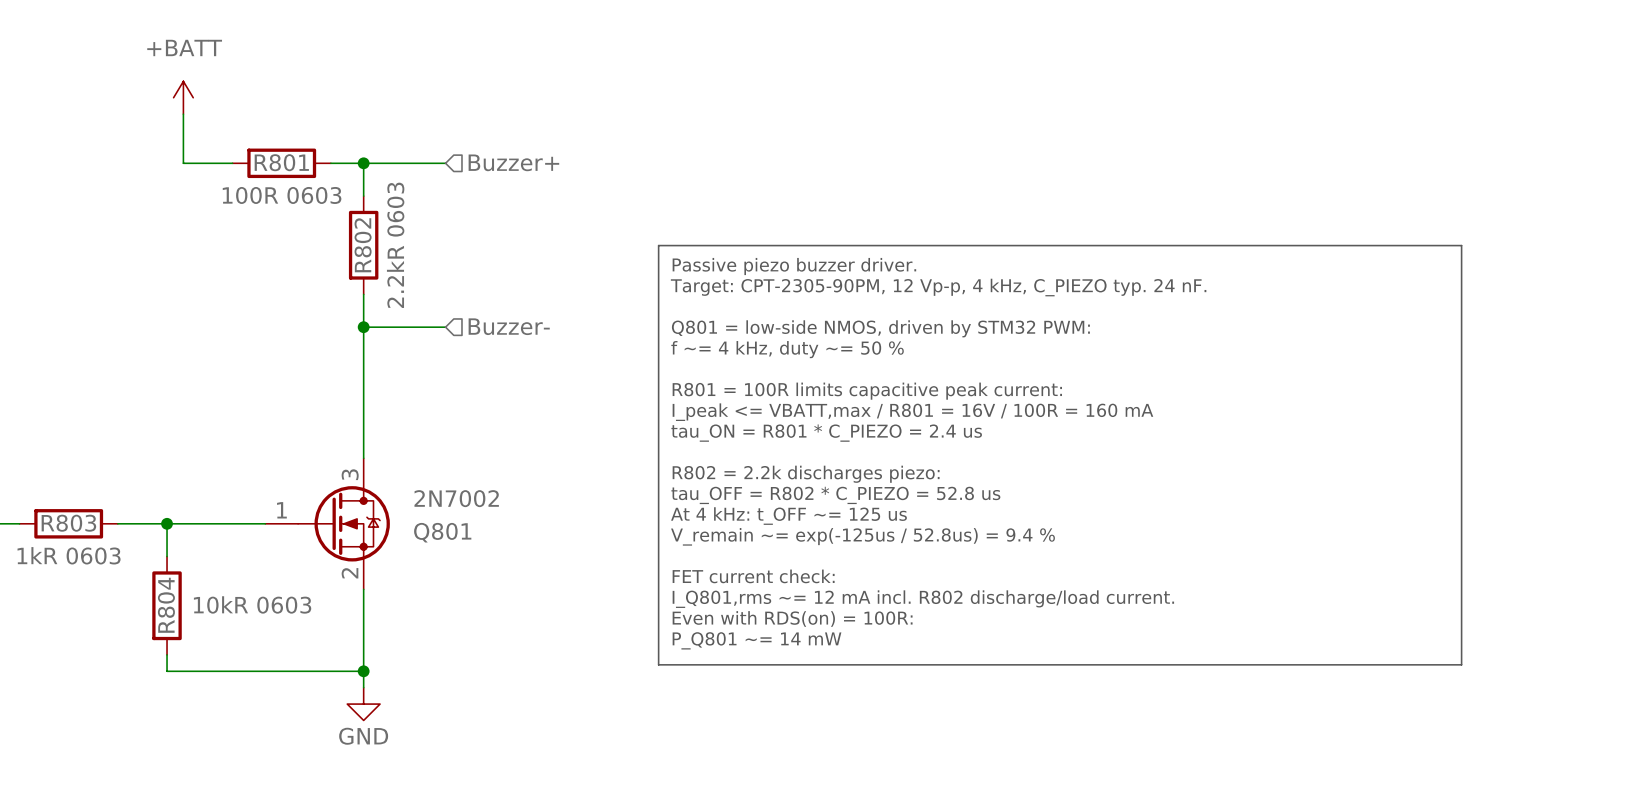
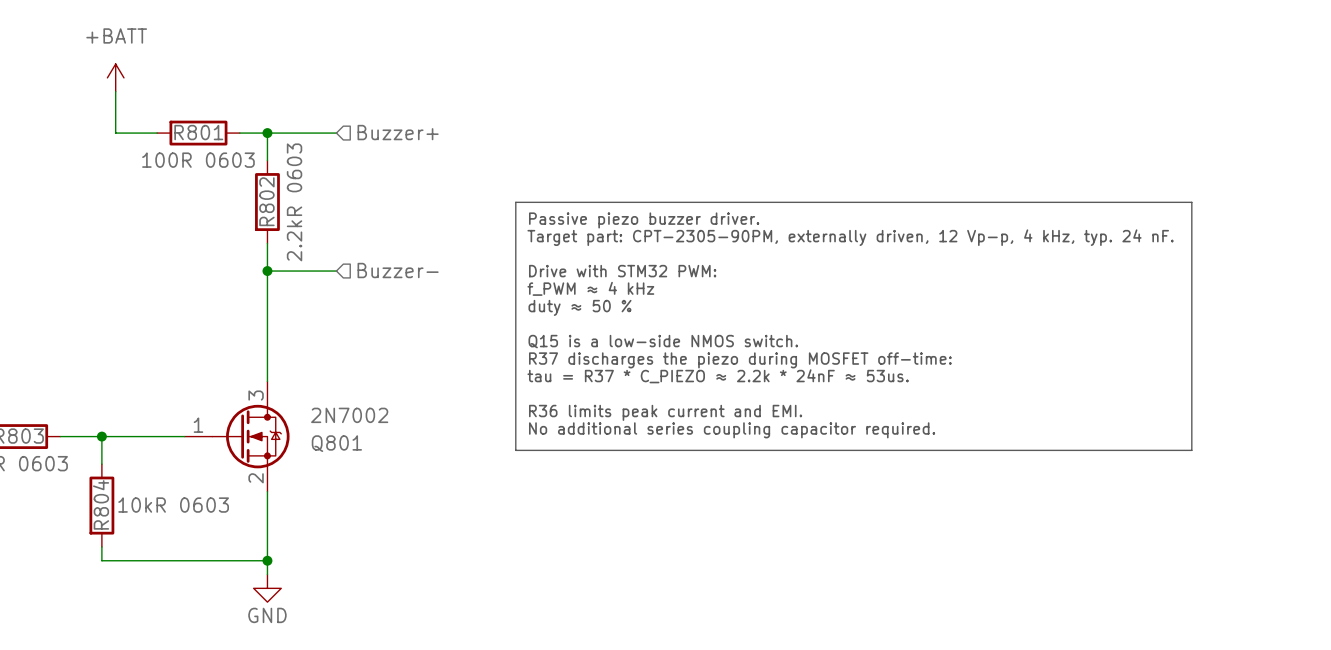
text: Target: CPT-2305-90PM, 12 Vp-p, 4 kHz, C_PIEZO typ. 24 nF. (938, 287) -> Target part: CPT-2305-90PM, externally driven, 12 Vp-p, 4 kHz, typ. 24 nF. (850, 237)
text: Q801 = low-side NMOS, driven by STM32 PWM: (880, 328) -> Drive with STM32 PWM: (622, 271)
text: f ~= 4 kHz, duty ~= 50 % (787, 349) -> f_PWM ≈ 4 kHz (590, 288)
text: none -> duty ≈ 50 % (579, 307)
text: R801 = 100R limits capacitive peak current: (867, 391) -> none
text: I_peak <= VBATT,max / R801 = 16V / 100R = 160 mA (912, 412) -> Q15 is a low-side NMOS switch. (663, 341)
text: tau_ON = R801 * C_PIEZO = 2.4 us (826, 433) -> R37 discharges the piezo during MOSFET off-time: (740, 360)
text: none -> tau = R37 * C_PIEZO ≈ 2.2k * 24nF ≈ 53us. (718, 376)
text: R802 = 2.2k discharges piezo: (806, 474) -> none
text: tau_OFF = R802 * C_PIEZO = 52.8 us (835, 495) -> R36 limits peak current and EMI. (665, 412)
text: At 4 kHz: t_OFF ~= 125 us (788, 516) -> No additional series coupling capacitor required. (732, 430)
text: V_remain ~= exp(-125us / 52.8us) = 9.4 % (862, 536) -> none
line: (658, 540) (658, 664) (1461, 664) (1461, 540) -> (515, 450) (1191, 450)
text: FET current check: (753, 576) -> none
text: I_Q801,rms ~= 12 mA incl. R802 discharge/load current. (923, 599) -> none
text: Even with RDS(on) = 100R: (792, 618) -> none
text: P_Q801 ~= 14 mW (757, 640) -> none

